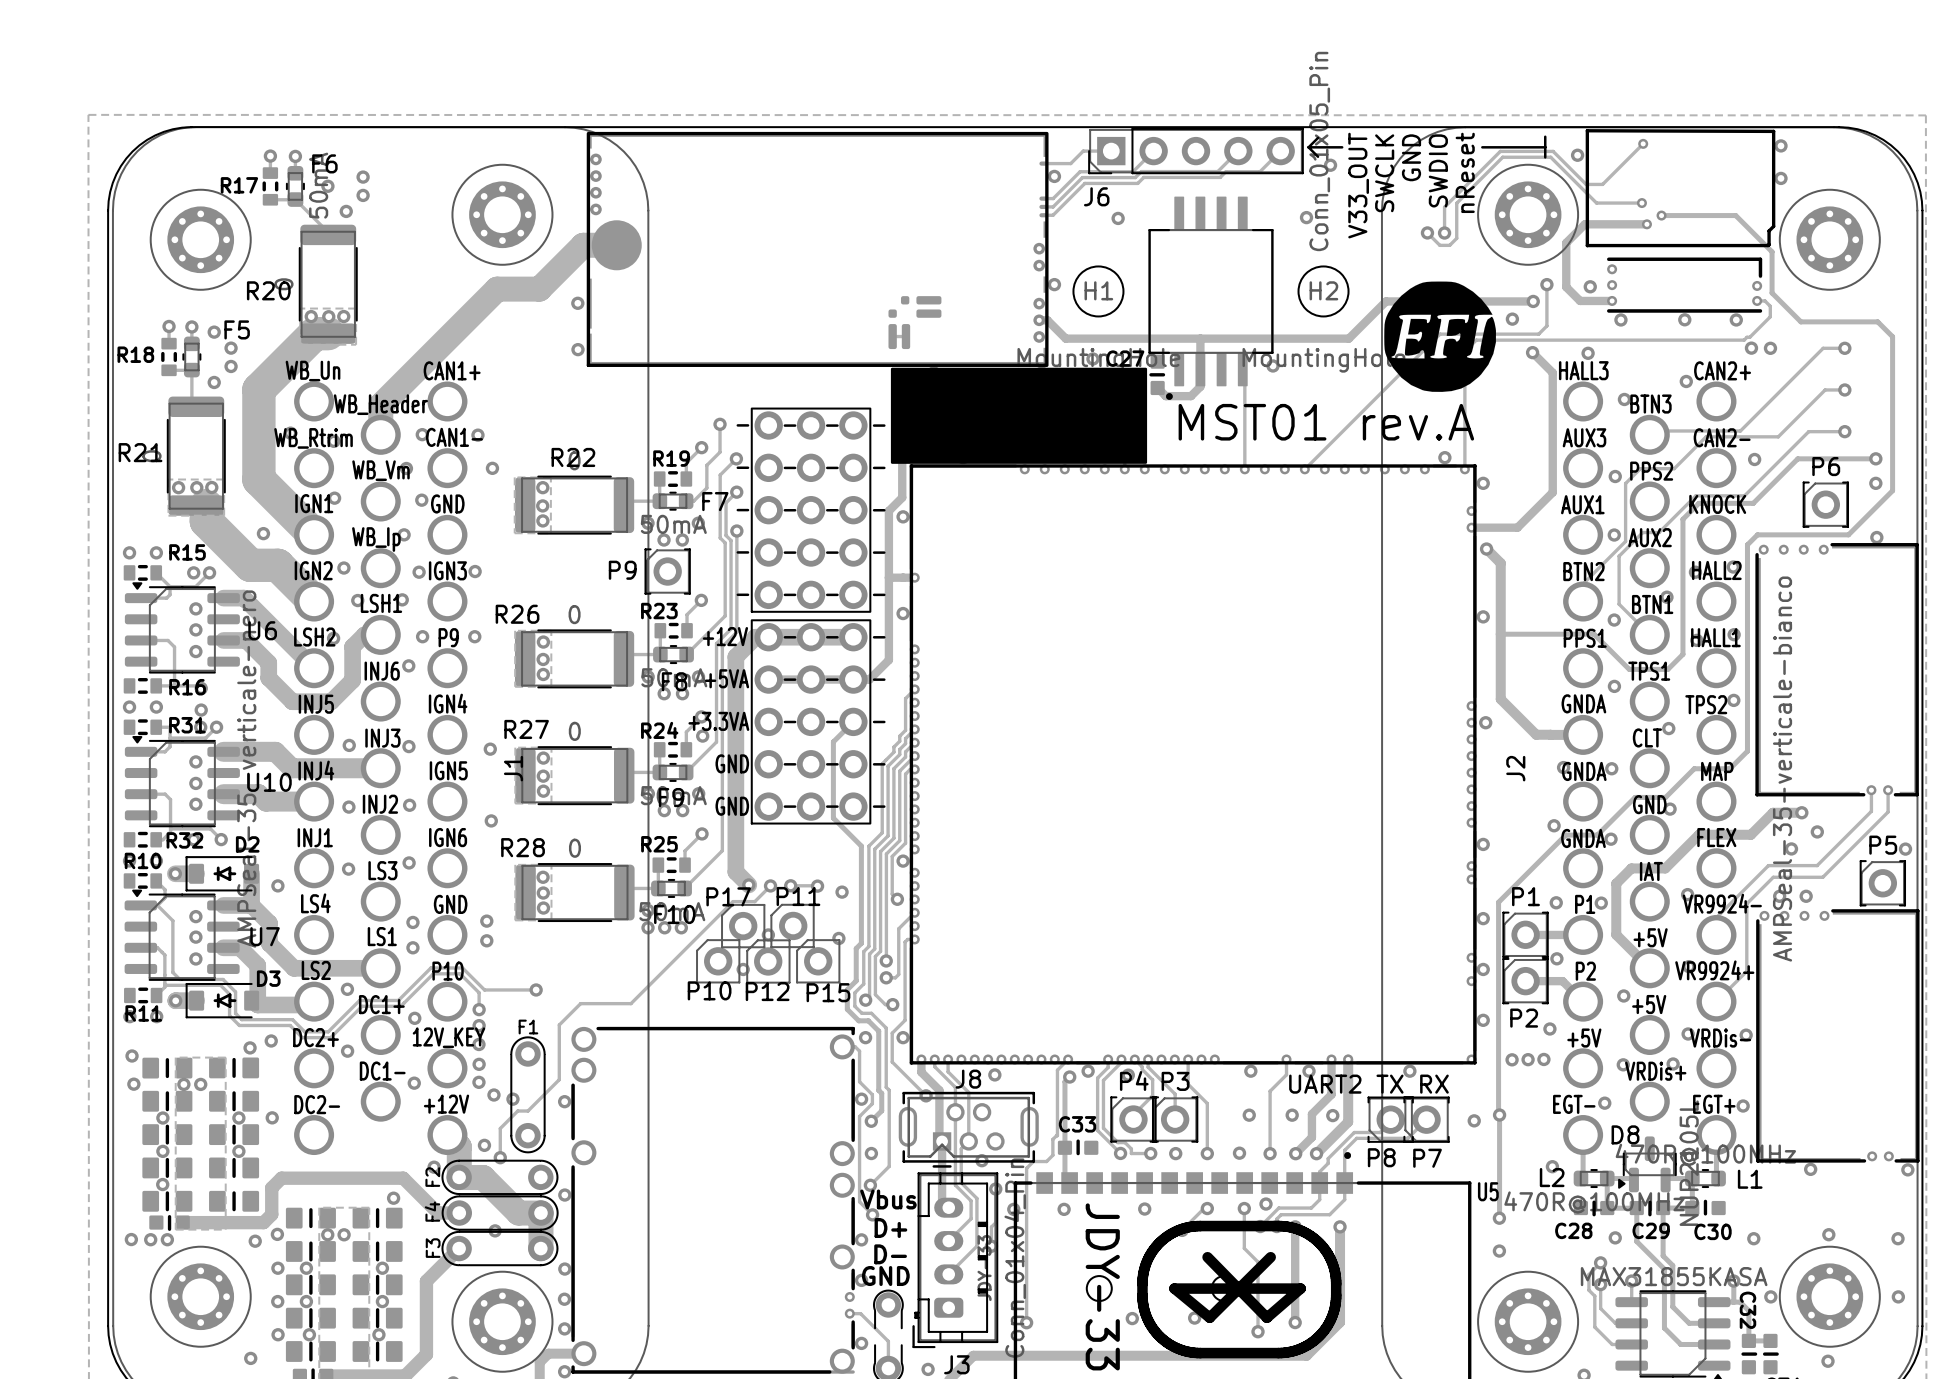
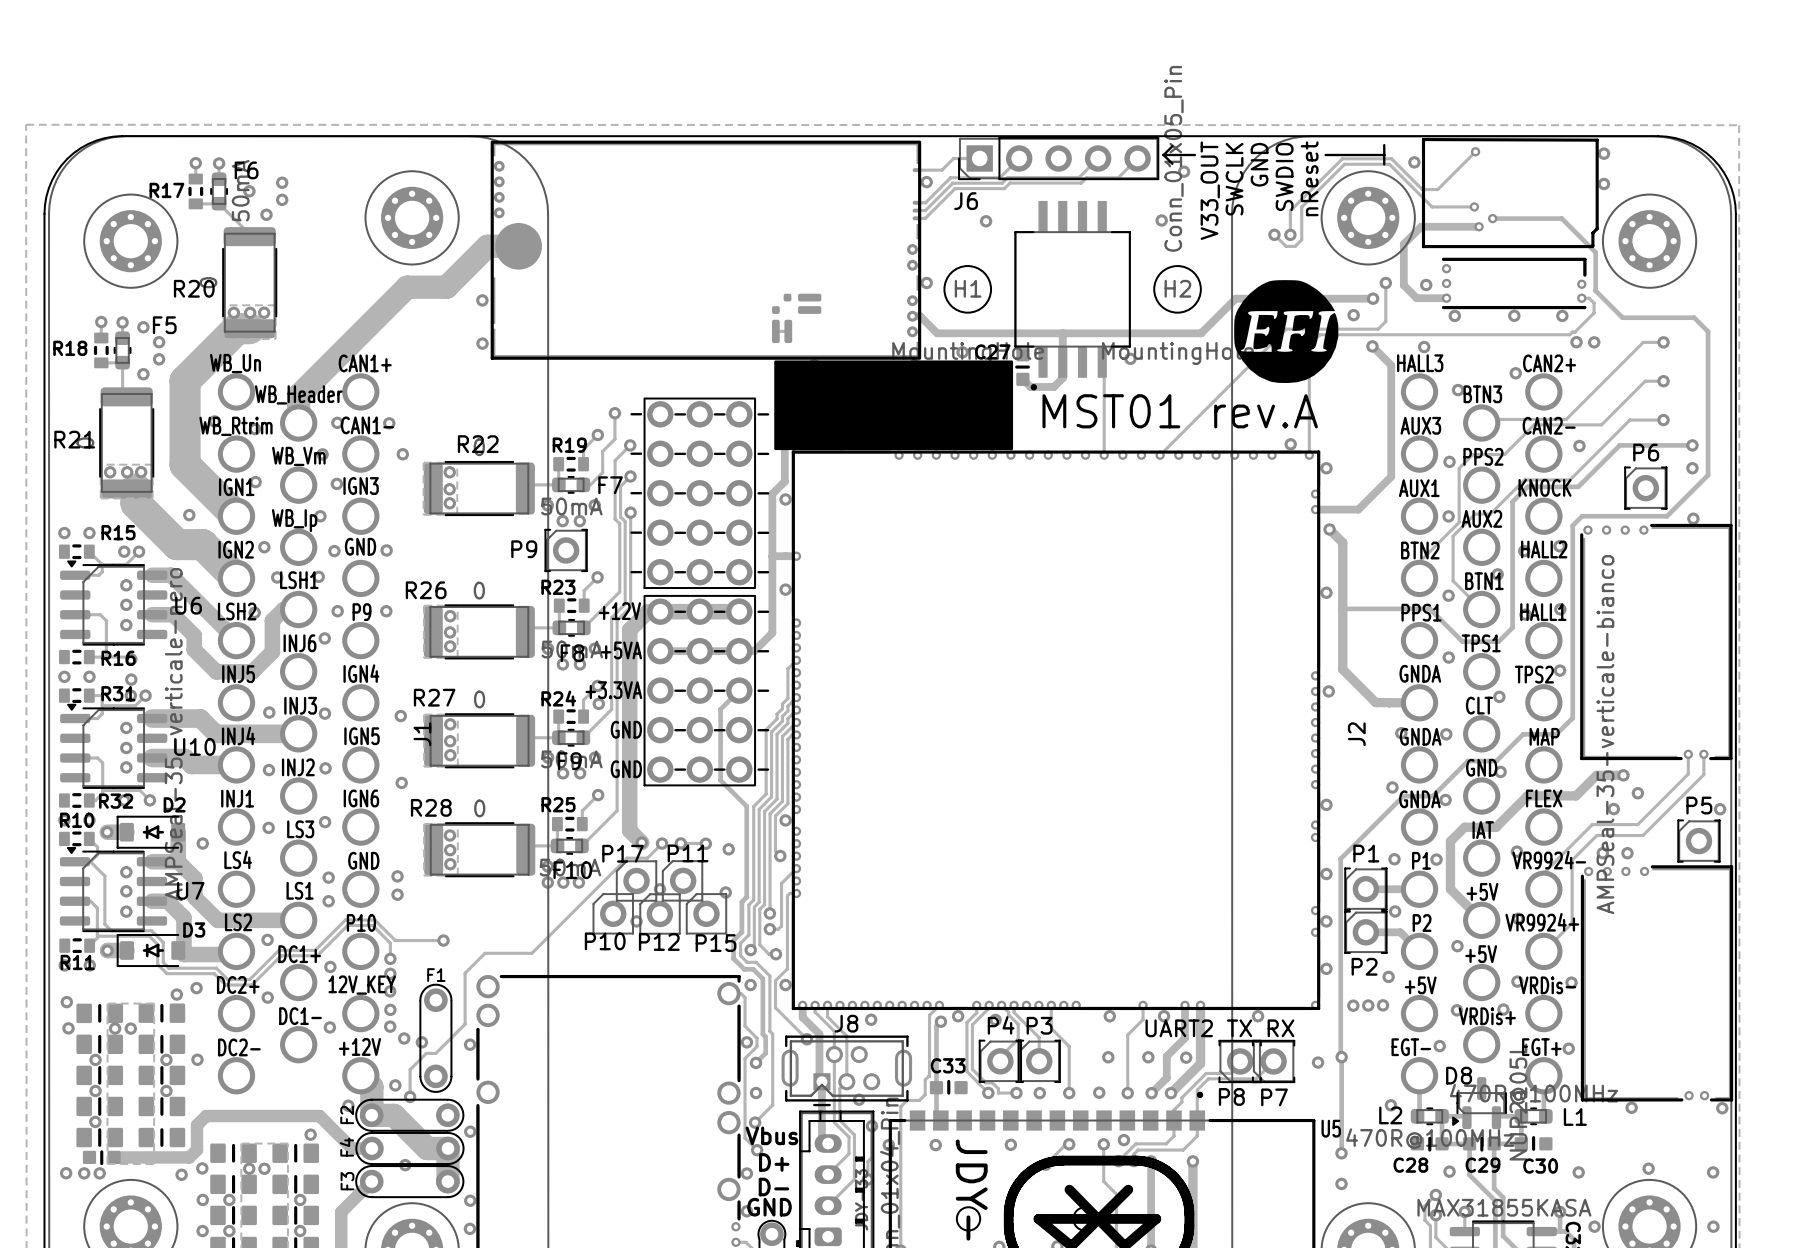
text: GND (447, 503) -> IGN3 (361, 486)
text: IGN3 (447, 570) -> GND (360, 546)

